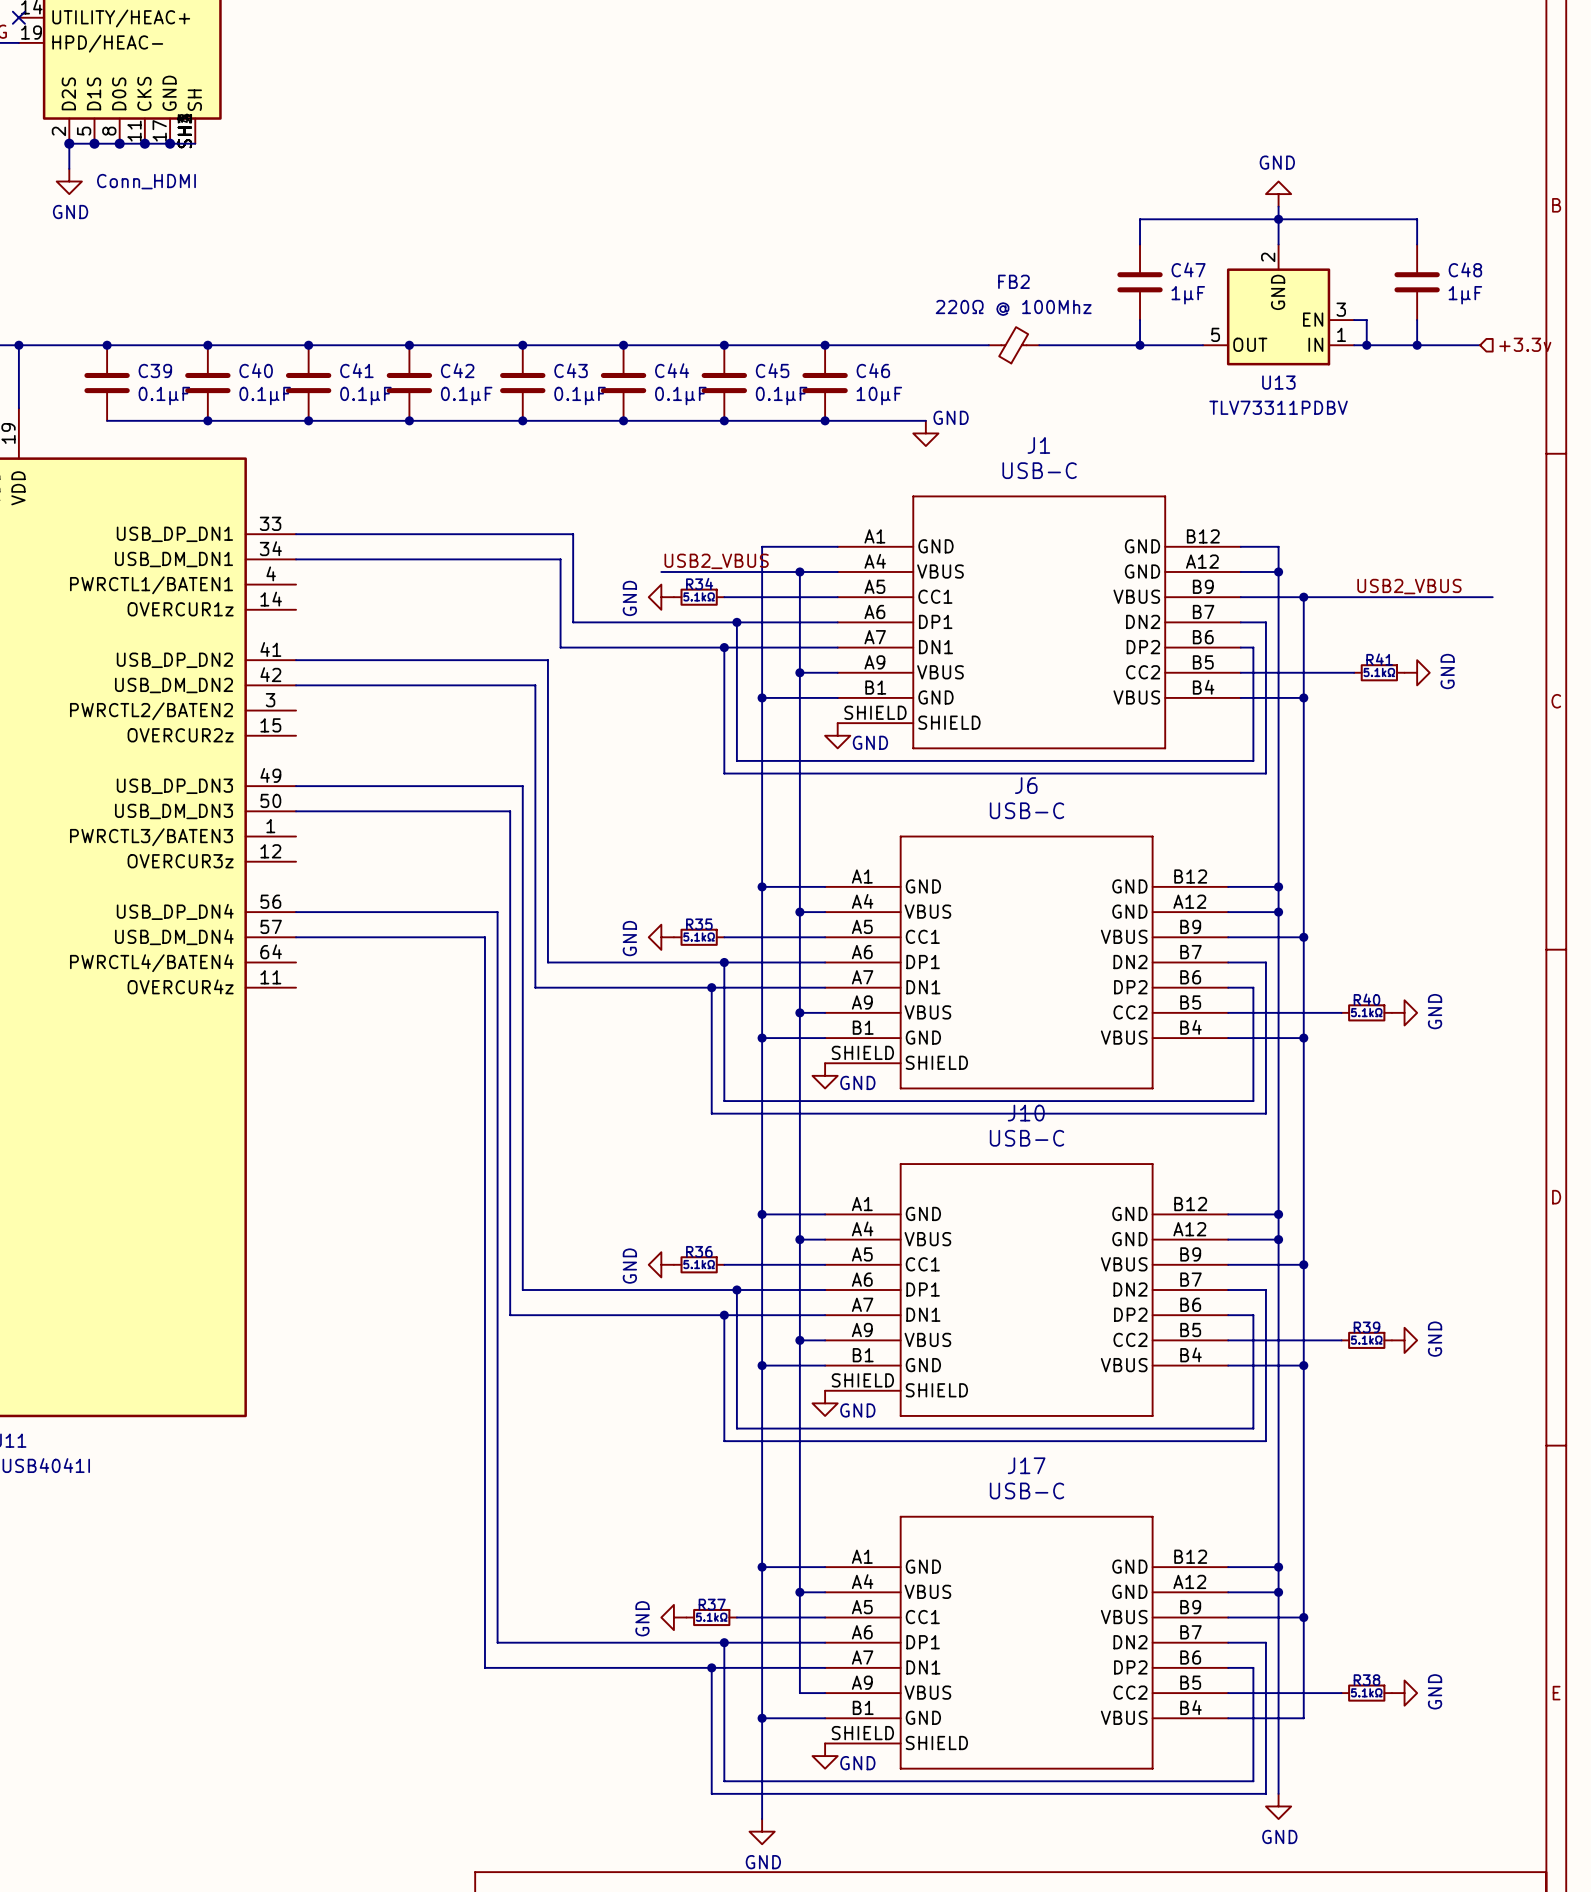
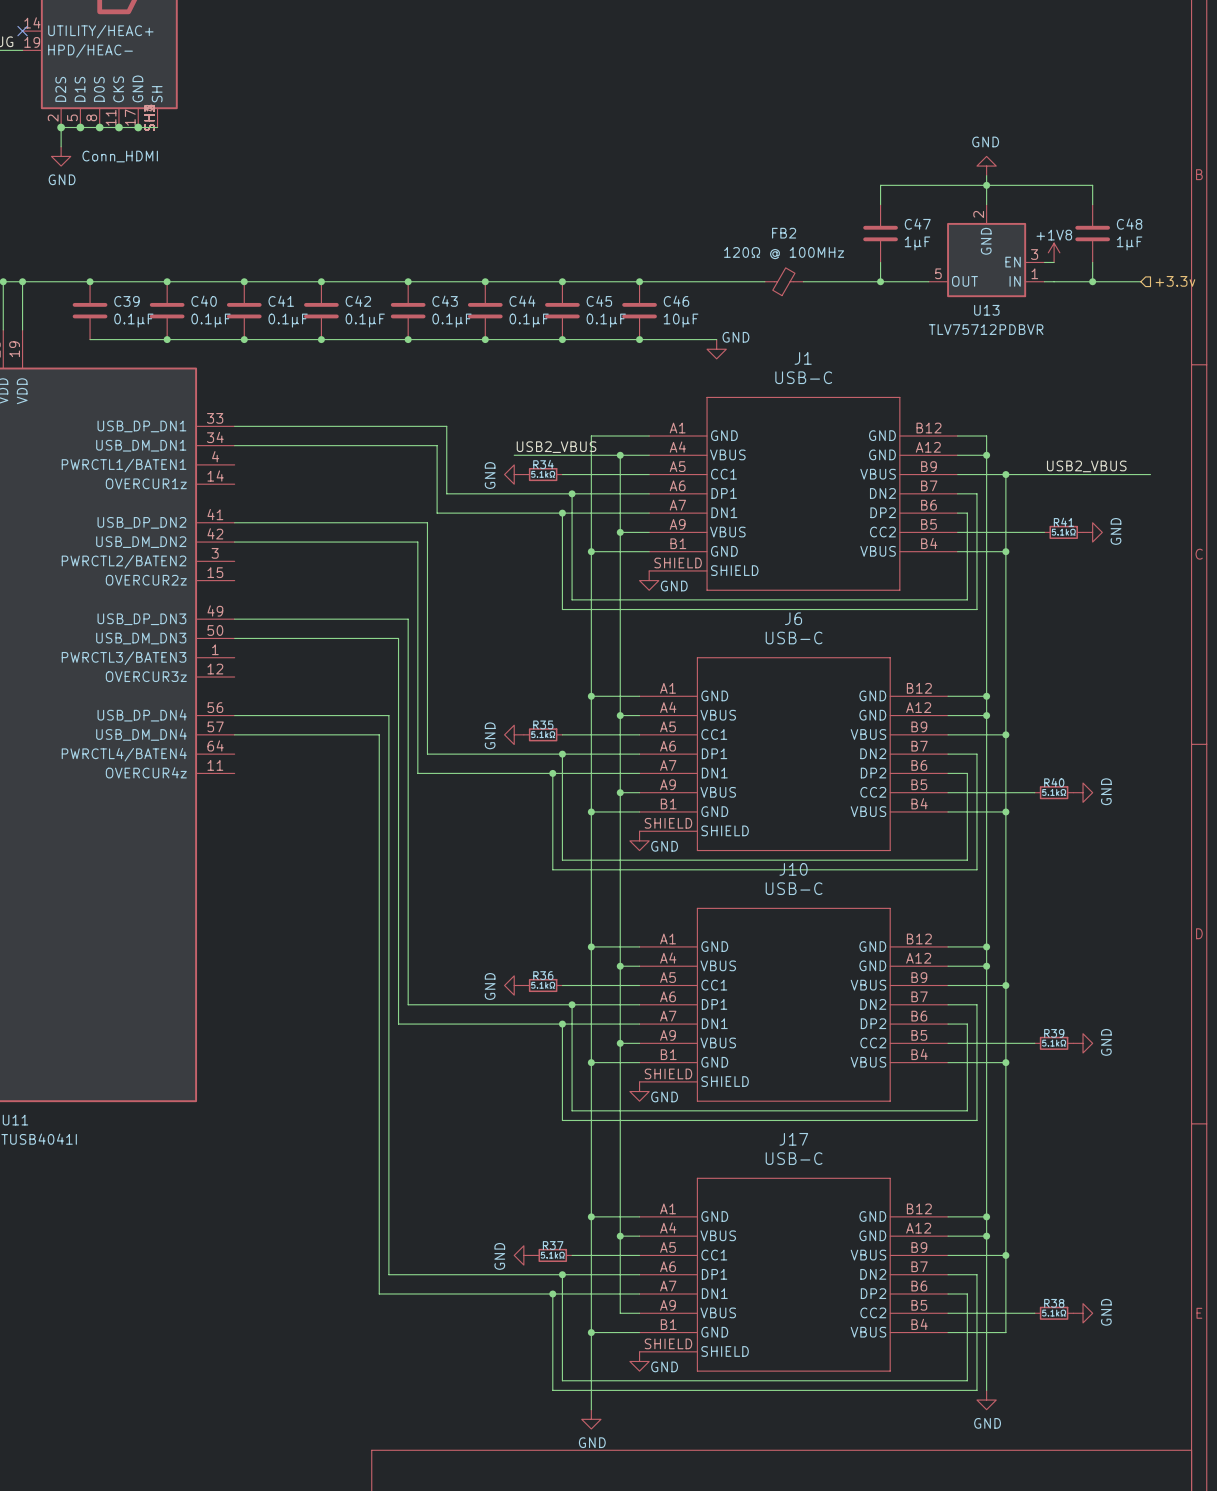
FB2 value: 220Ω @ 100Mhz (1013, 307) -> 120Ω @ 100MHz (784, 253)
power symbol: none -> +1V8 (1054, 252)
wire: (1366, 320) (1366, 345) -> none
junction: (1366, 345) -> none
U13 value: TLV73311PDBV (1278, 407) -> TLV75712PDBVR (986, 329)

